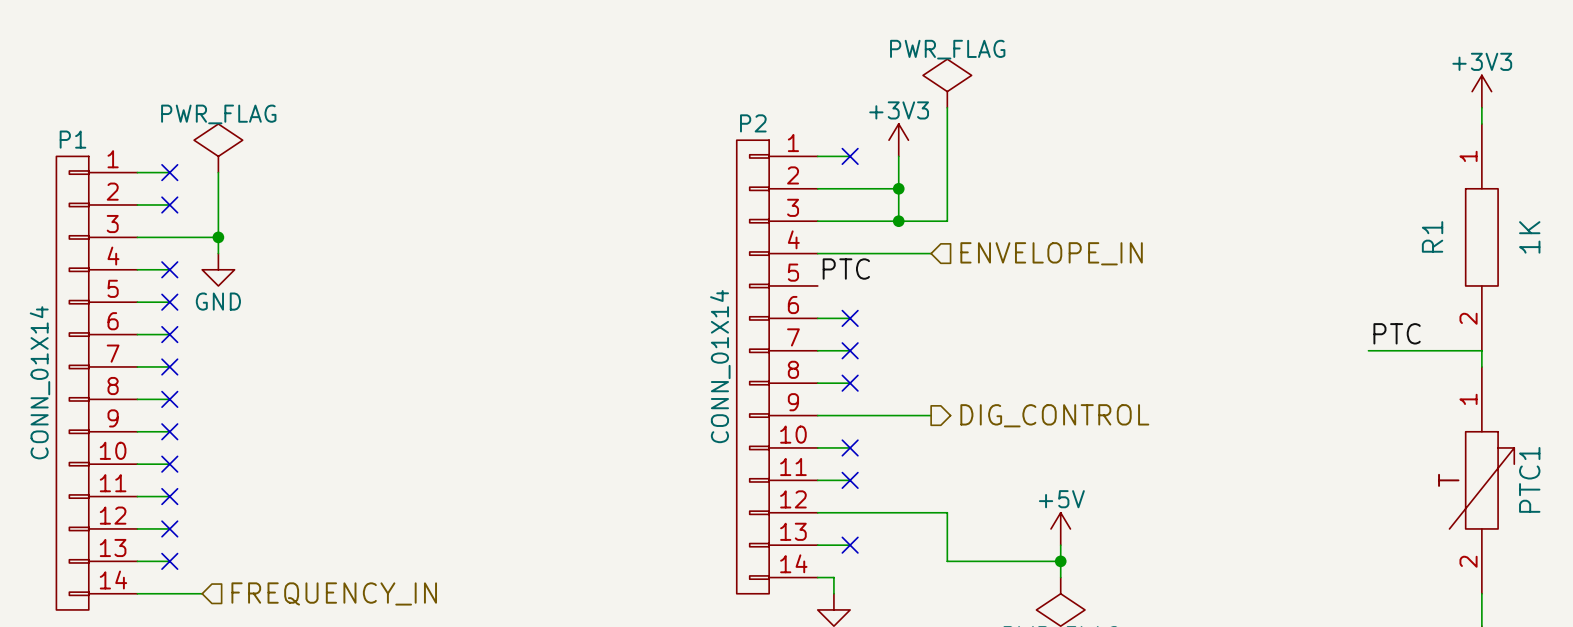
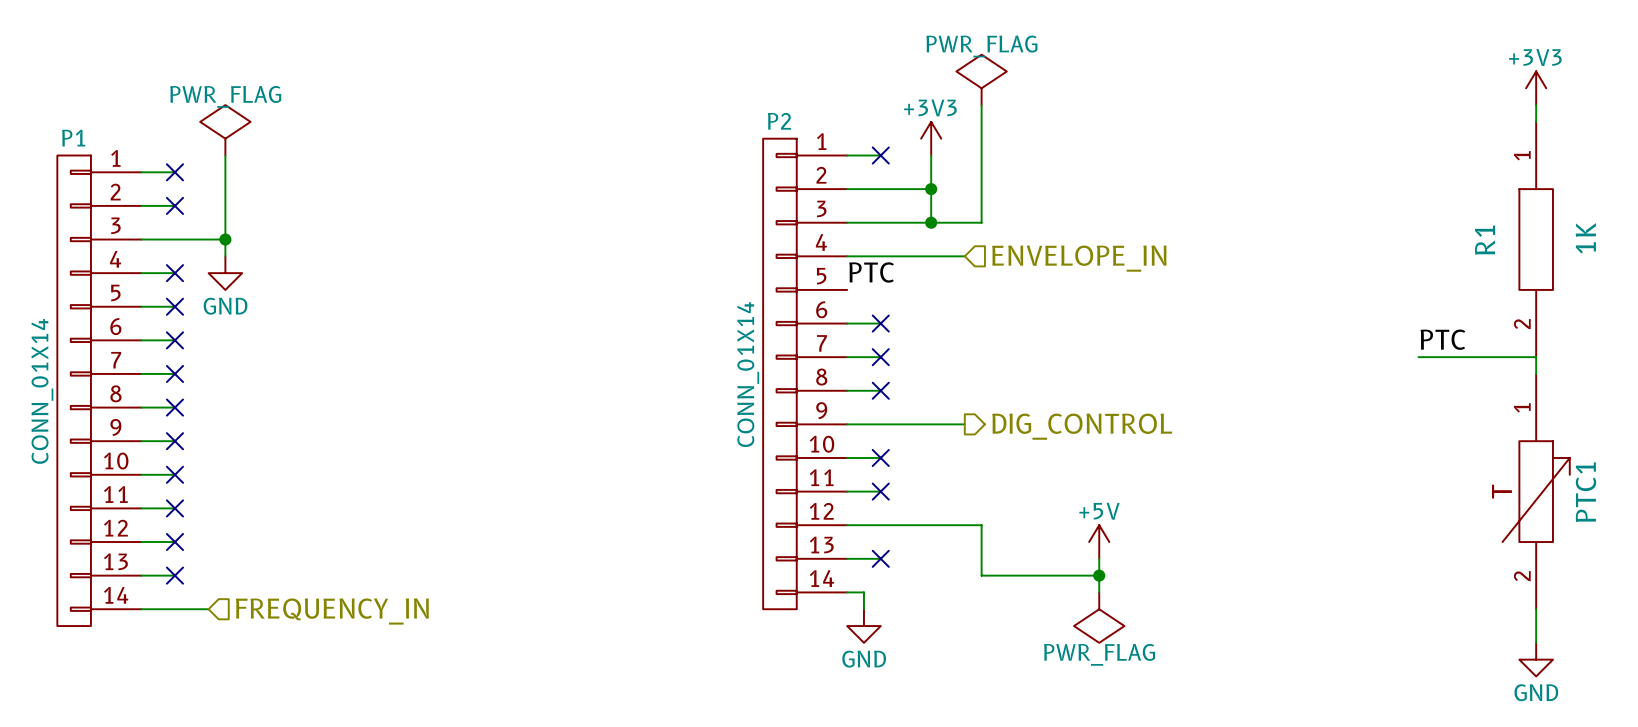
power symbol position: PWR_FLAG (218, 148) -> PWR_FLAG (225, 130)

